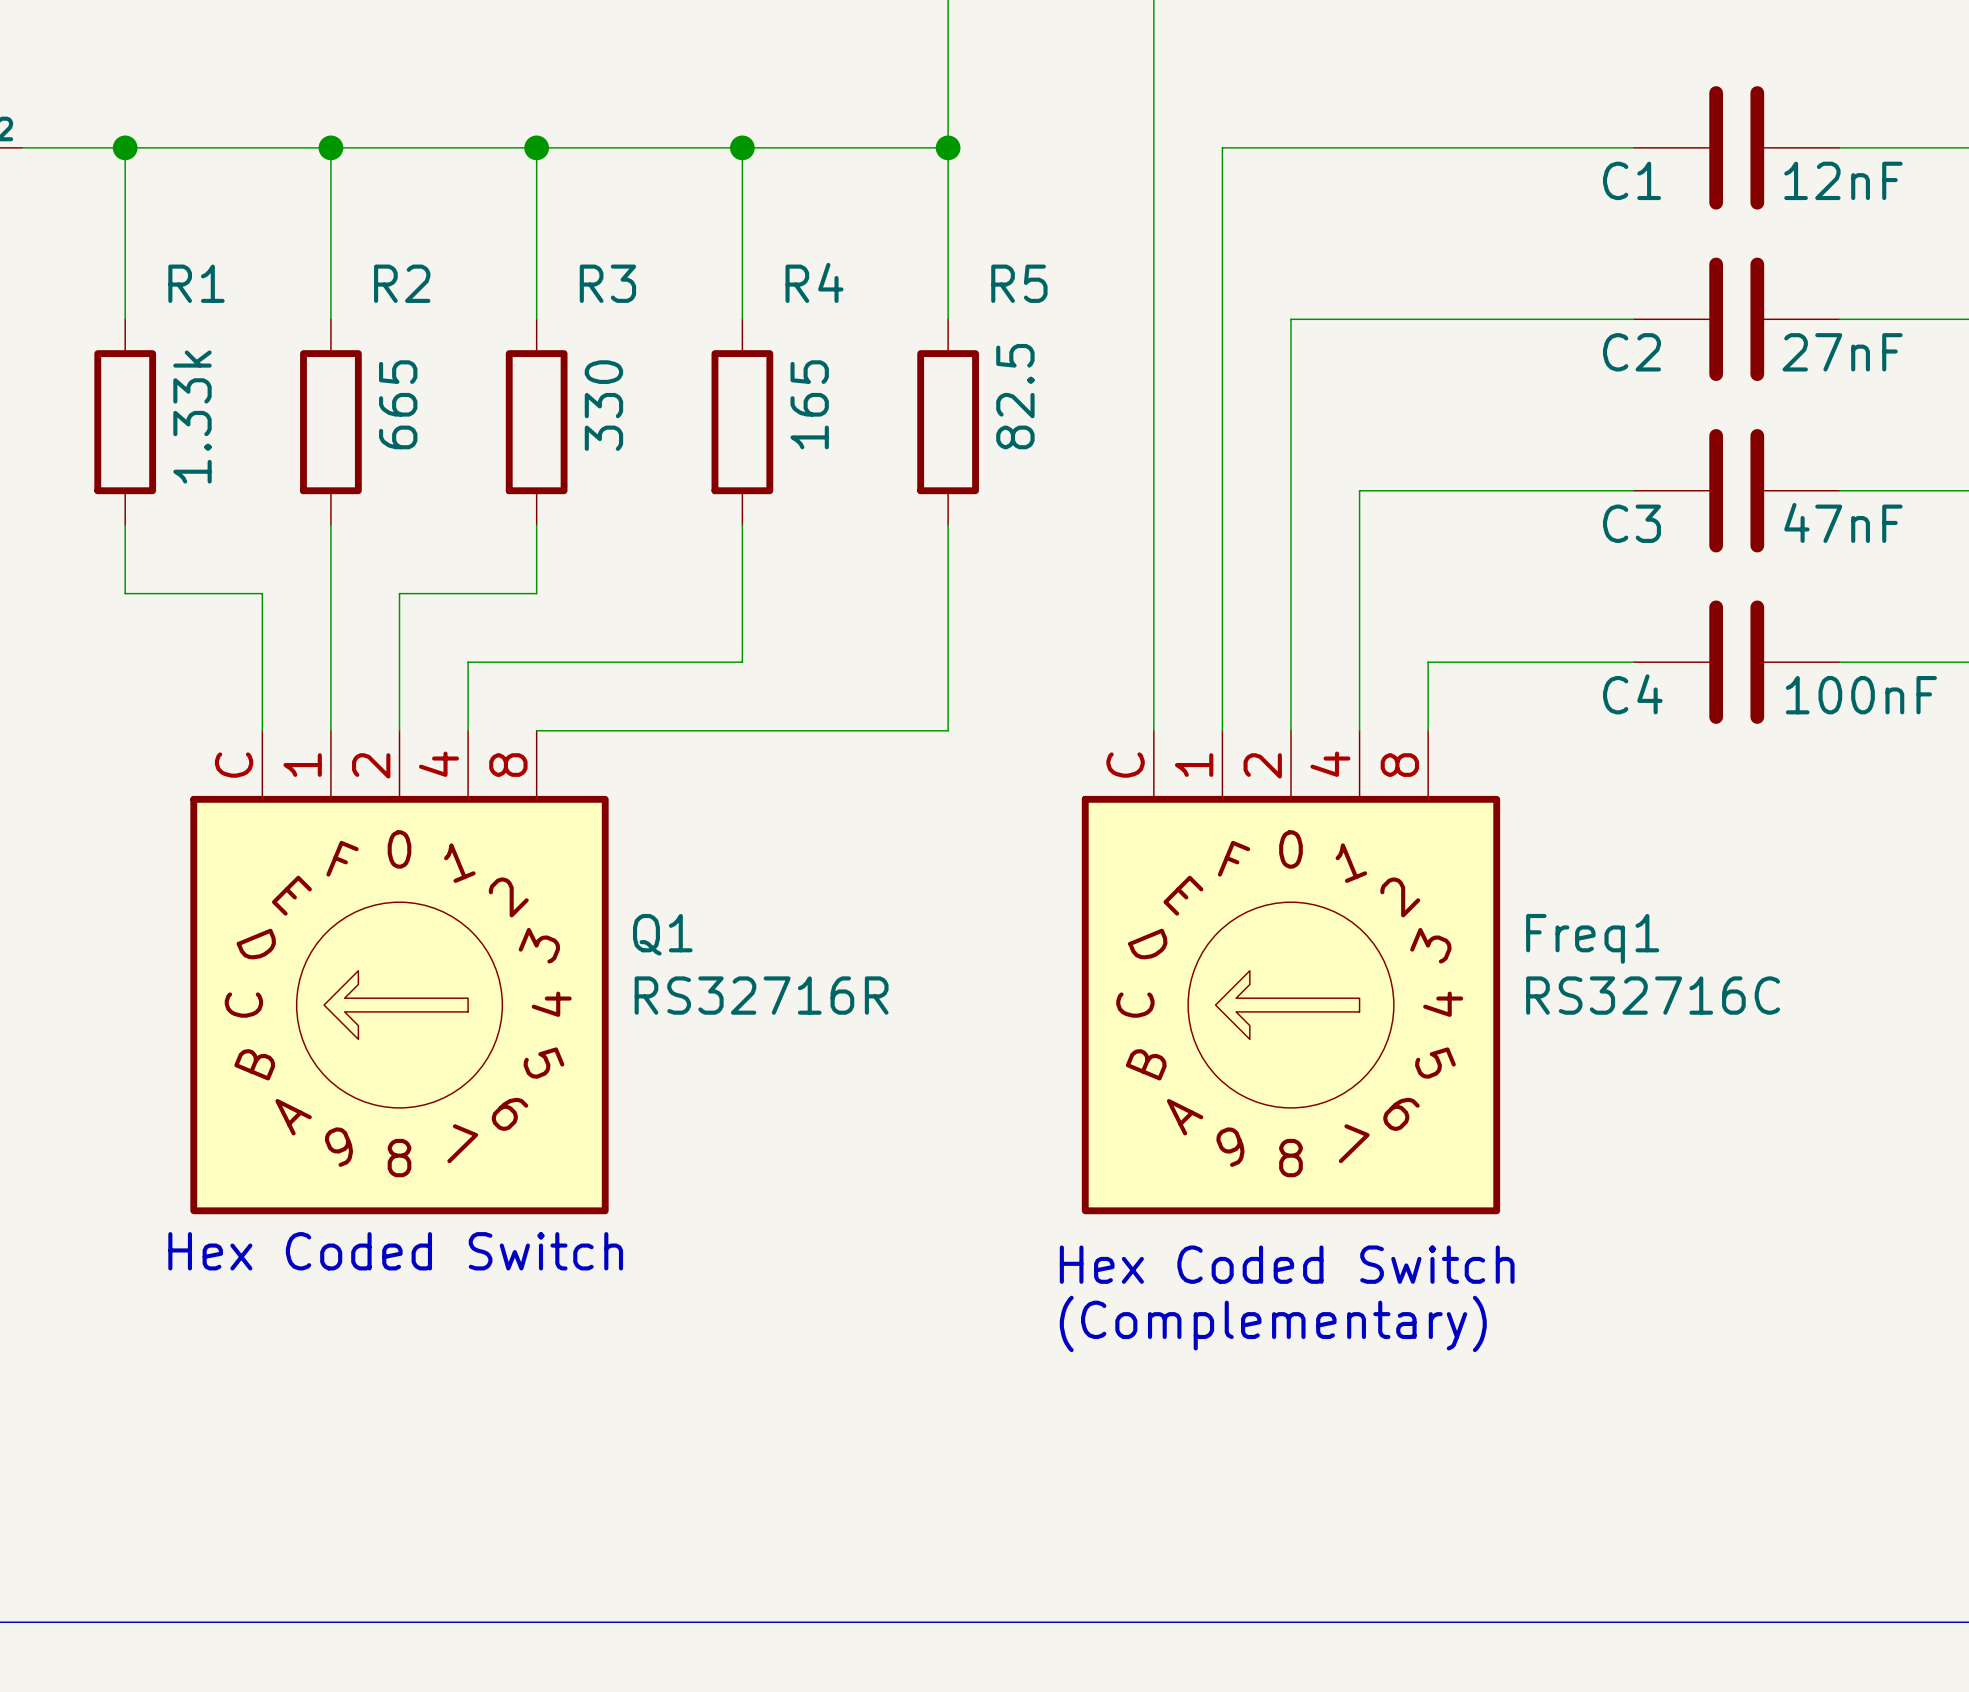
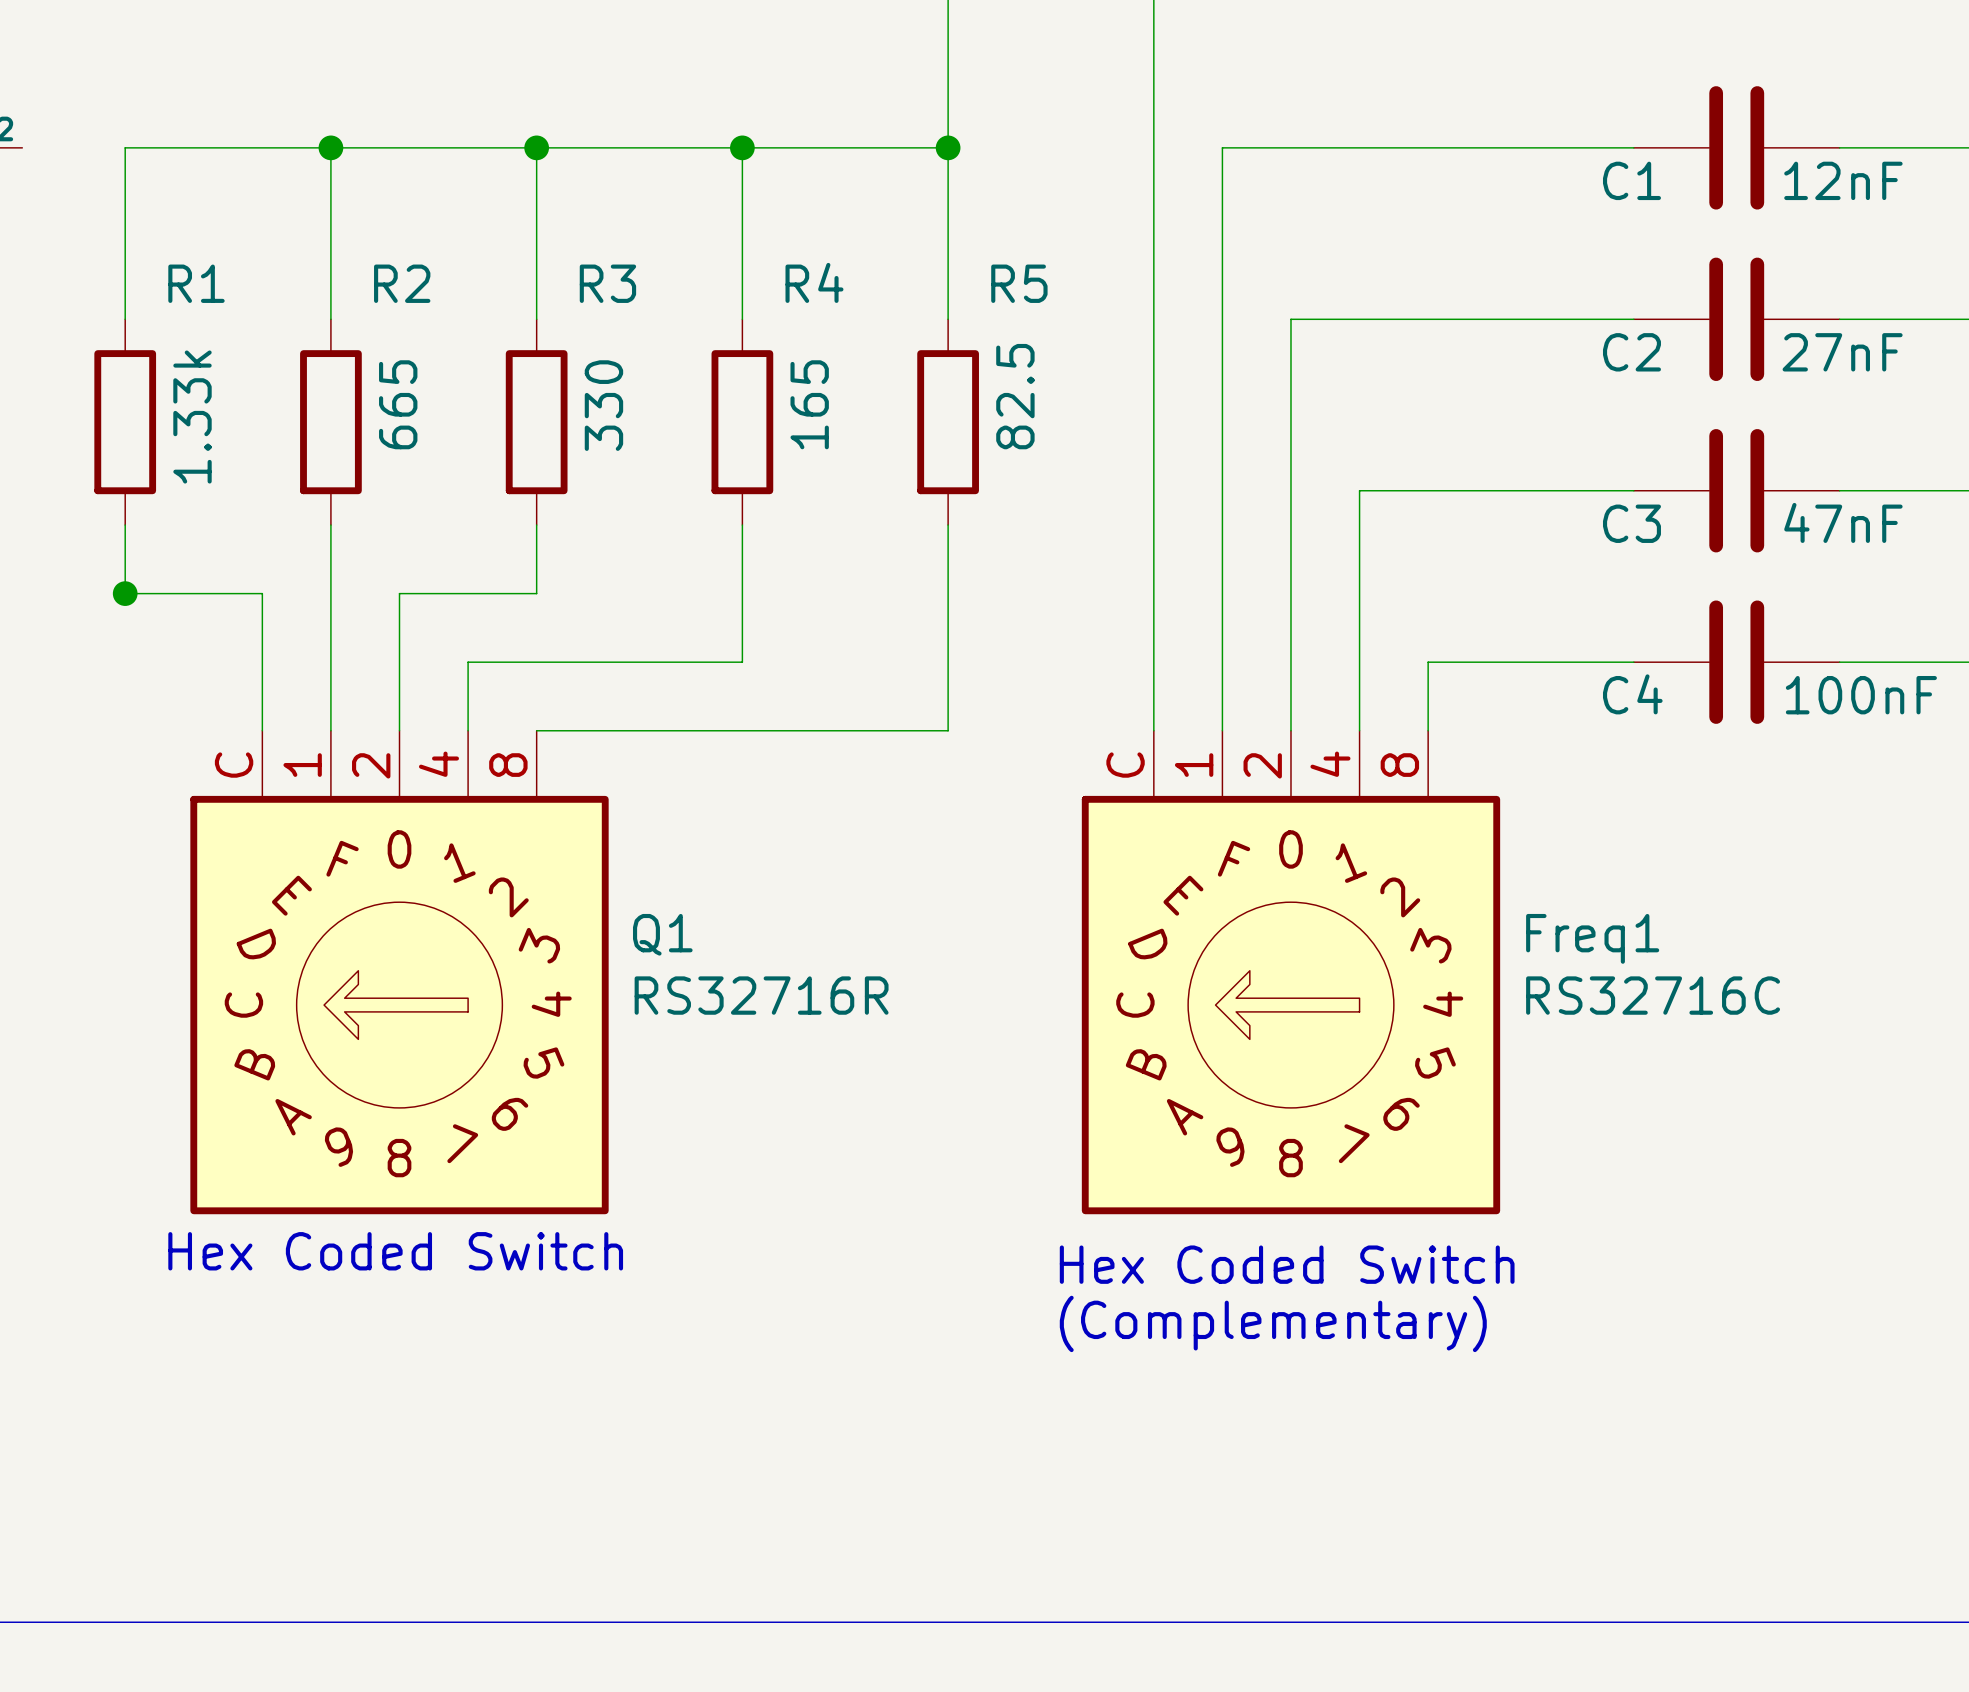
wire: (22, 147) (125, 147) -> none
junction: (125, 147) -> none
junction: none -> (125, 593)

